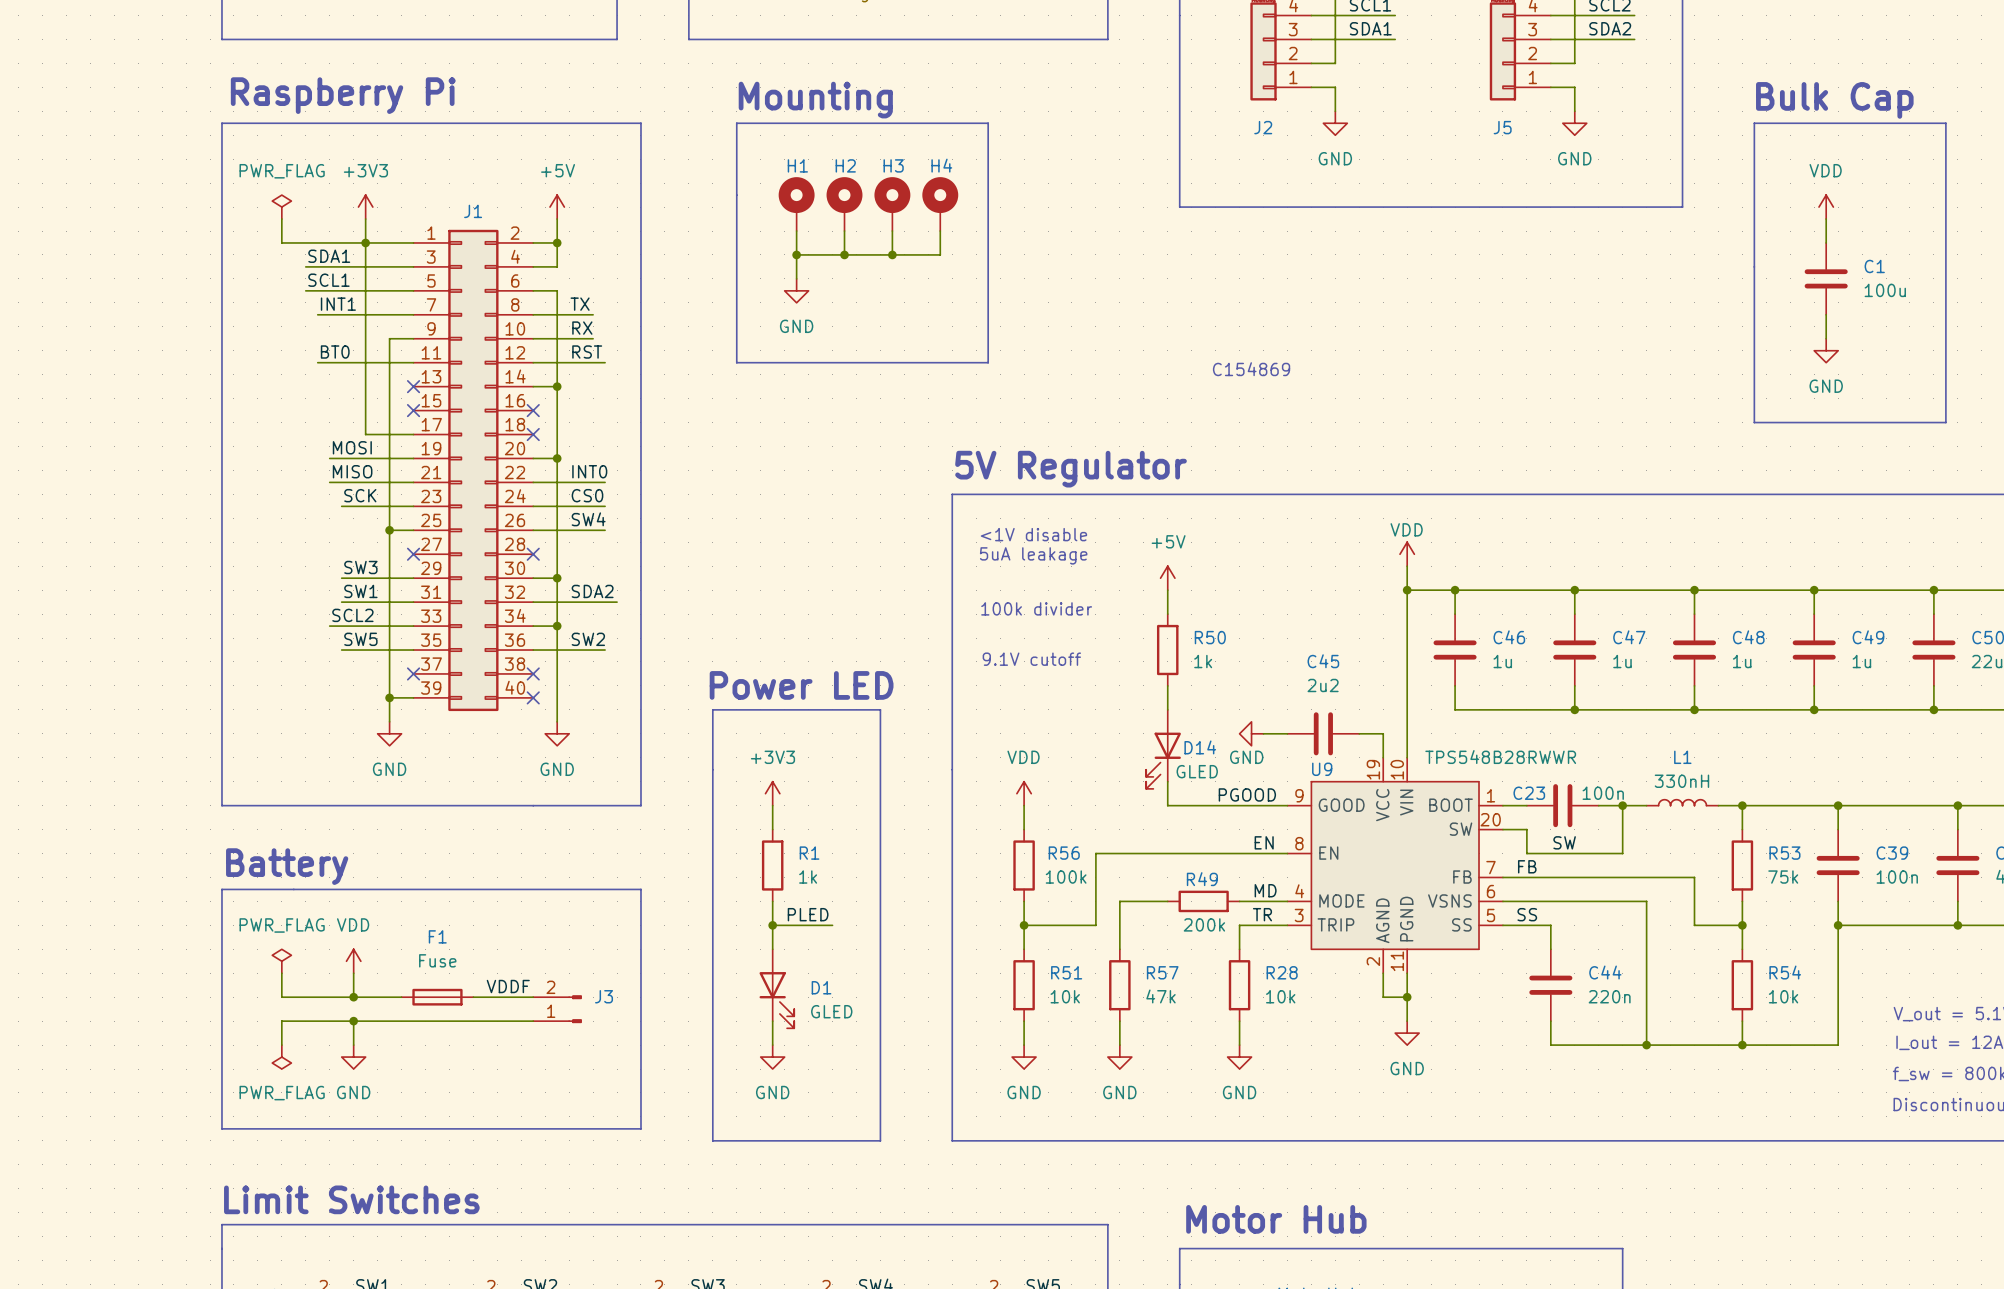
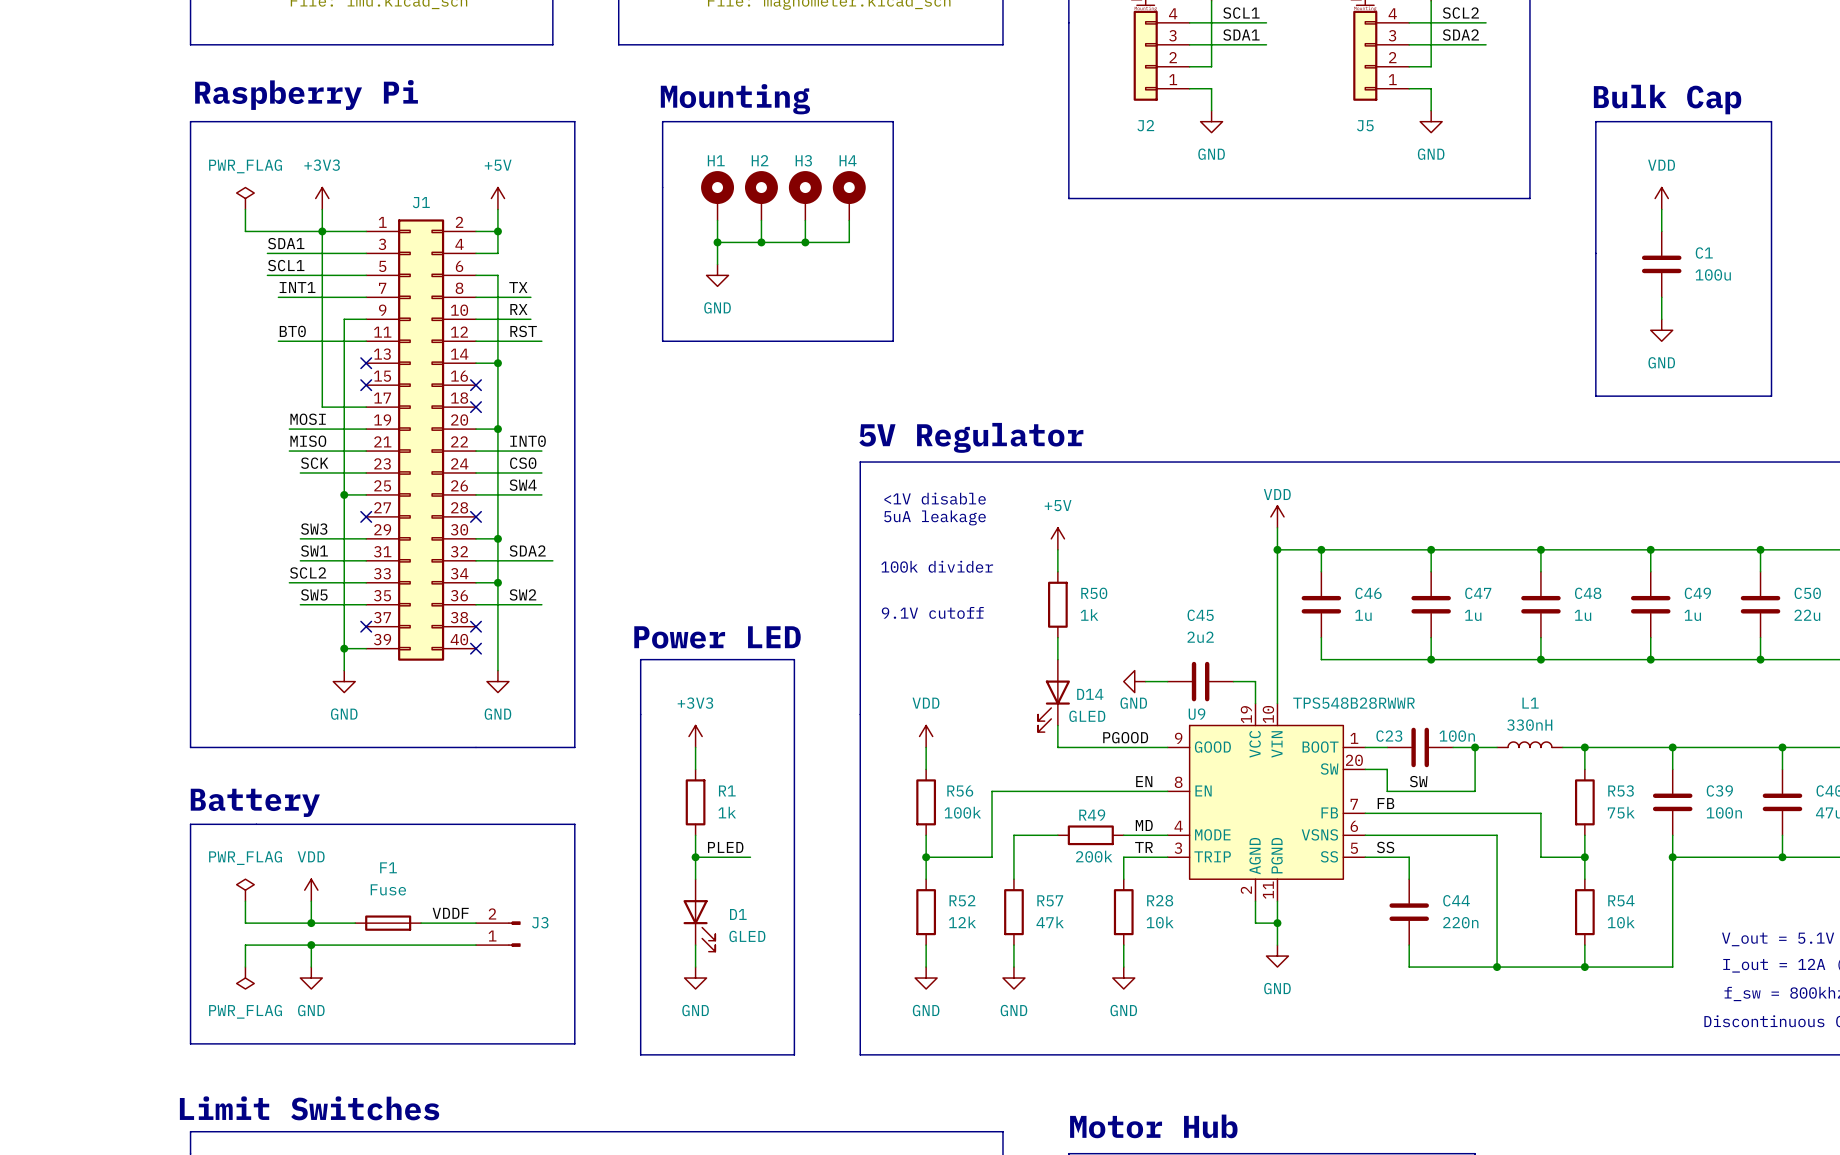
text: C154869 (1251, 369) -> none
R51 name: R51 (1066, 972) -> R52 (962, 900)
R51 value: 10k (1065, 996) -> 12k (962, 922)

